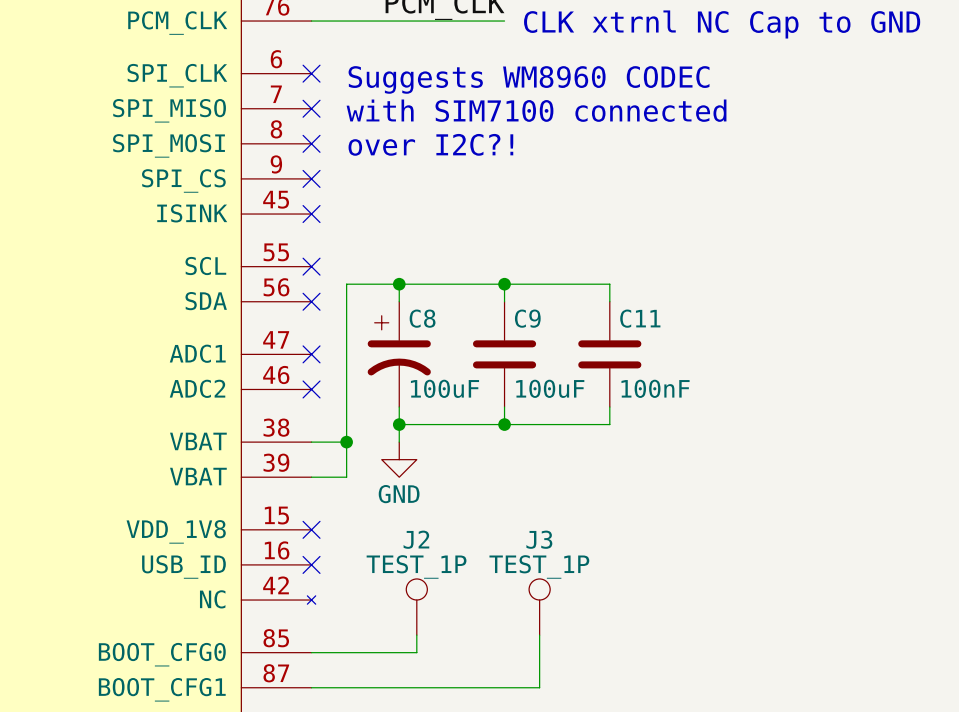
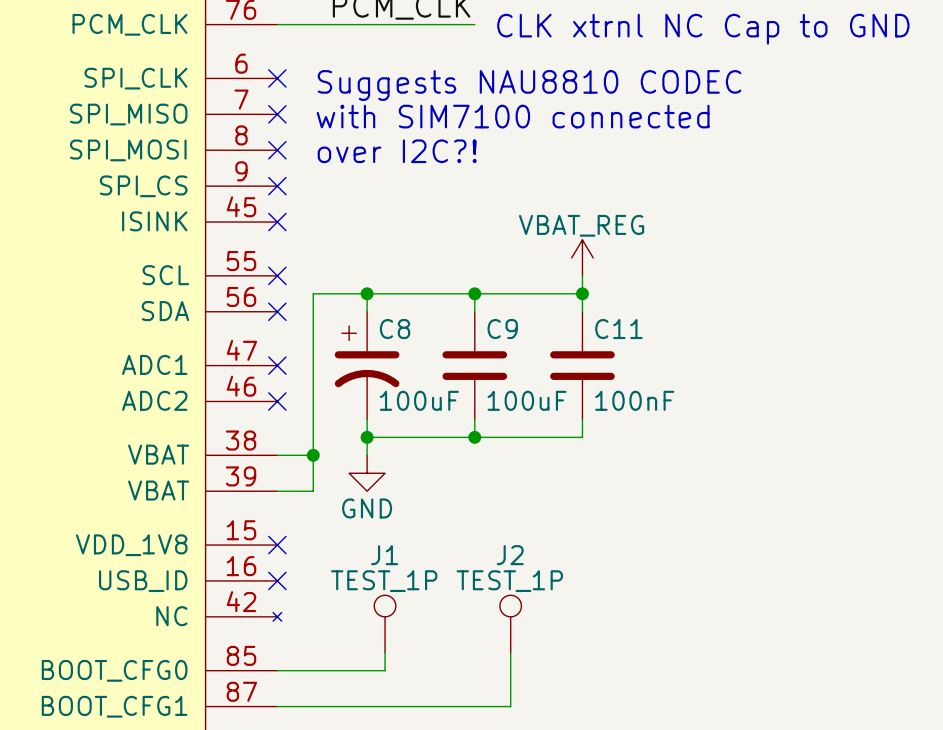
text: Suggests WM8960 CODEC (529, 79) -> Suggests NAU8810 CODEC (529, 85)
power symbol: none -> VBAT_REG (582, 257)
wire: none -> (582, 275) (582, 293)
junction: none -> (582, 293)
J2 name: J2 (416, 539) -> J1 (384, 555)
J3 name: J3 (539, 539) -> J2 (510, 555)

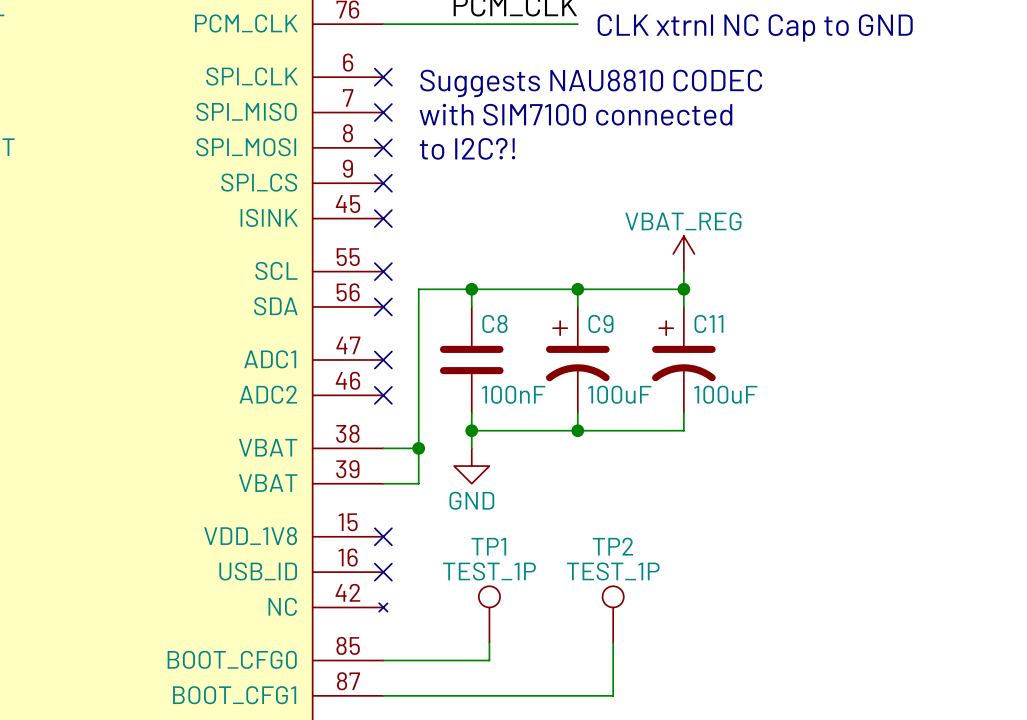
text: over I2C?! (397, 151) -> to I2C?! (467, 148)
C8 symbol: [334, 311, 400, 420] -> [439, 306, 504, 414]
C9 symbol: [442, 311, 508, 420] -> [545, 306, 610, 414]
C11 symbol: [550, 311, 615, 420] -> [652, 306, 716, 414]
C8 value: 100uF (419, 400) -> 100nF (513, 394)
C11 value: 100nF (634, 400) -> 100uF (725, 394)
J1 name: J1 (384, 555) -> TP1 (488, 546)
J2 name: J2 (510, 555) -> TP2 (612, 546)

